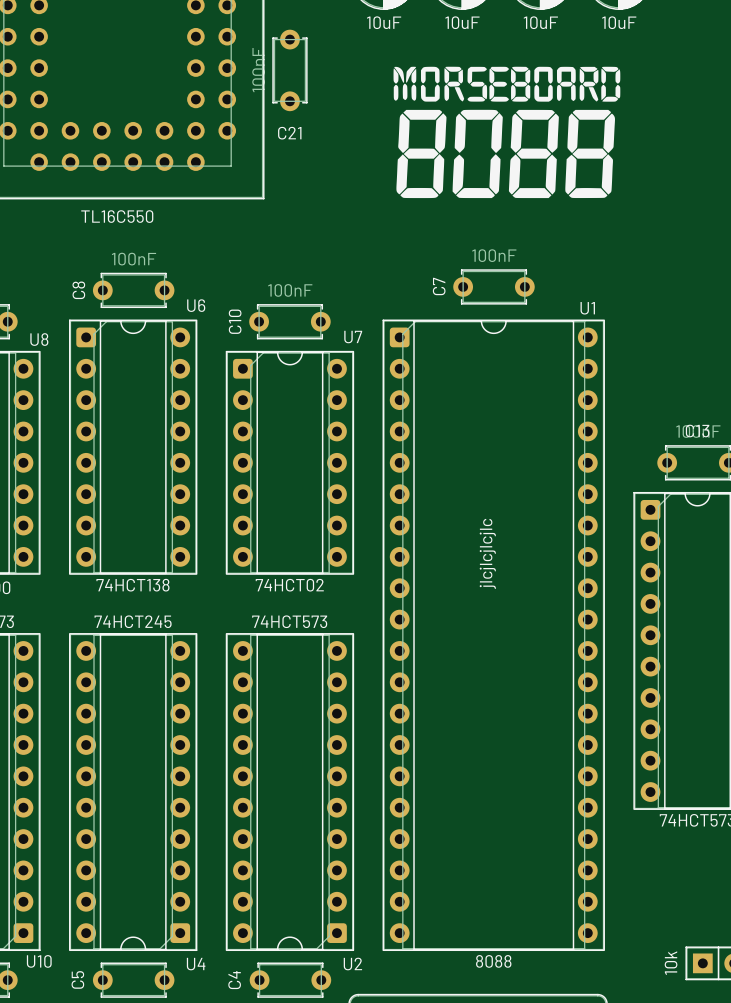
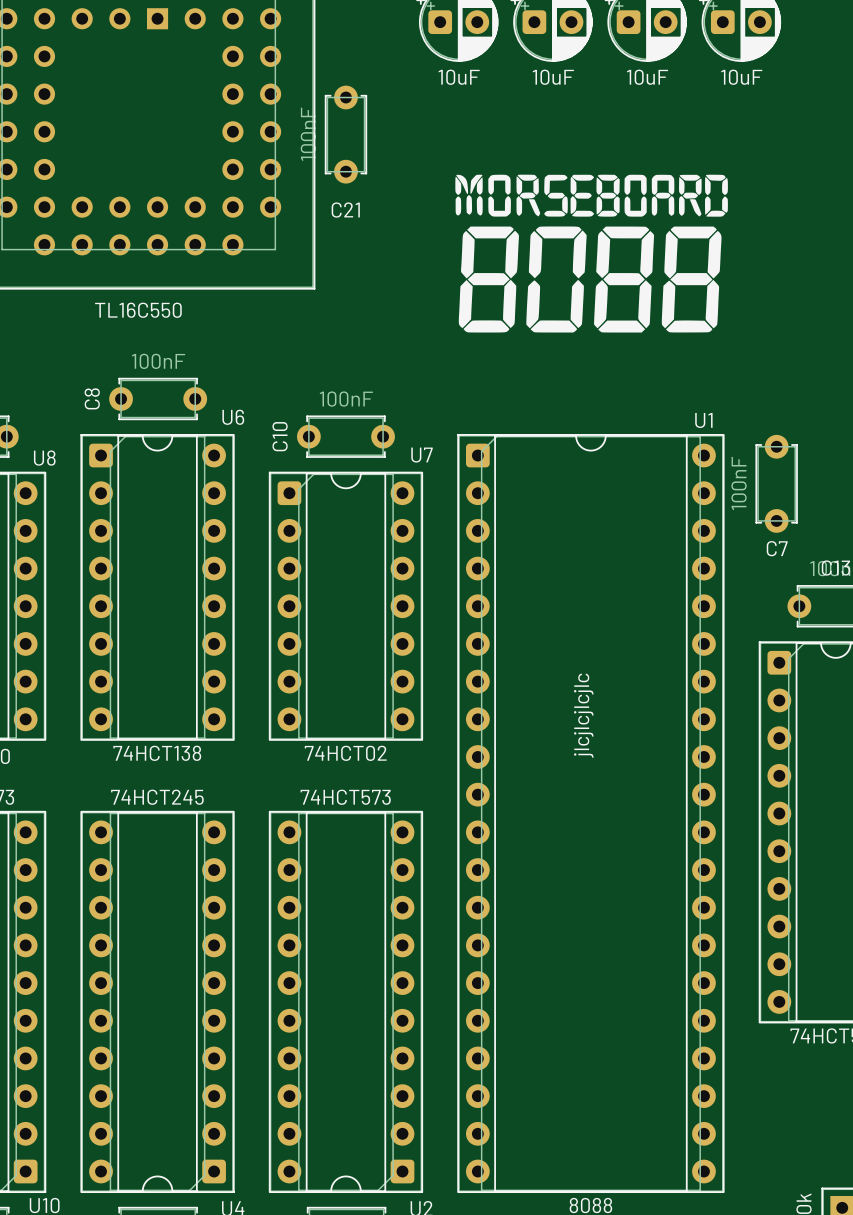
drawing position: (506, 132) -> (591, 253)
C7 value position: 100nF (494, 255) -> 100nF (739, 483)
C7 name position: C7 (439, 286) -> C7 (777, 548)
C7 rotation: 0° (493, 286) -> 90° clockwise (776, 483)
C7 position: (493, 286) -> (776, 483)

